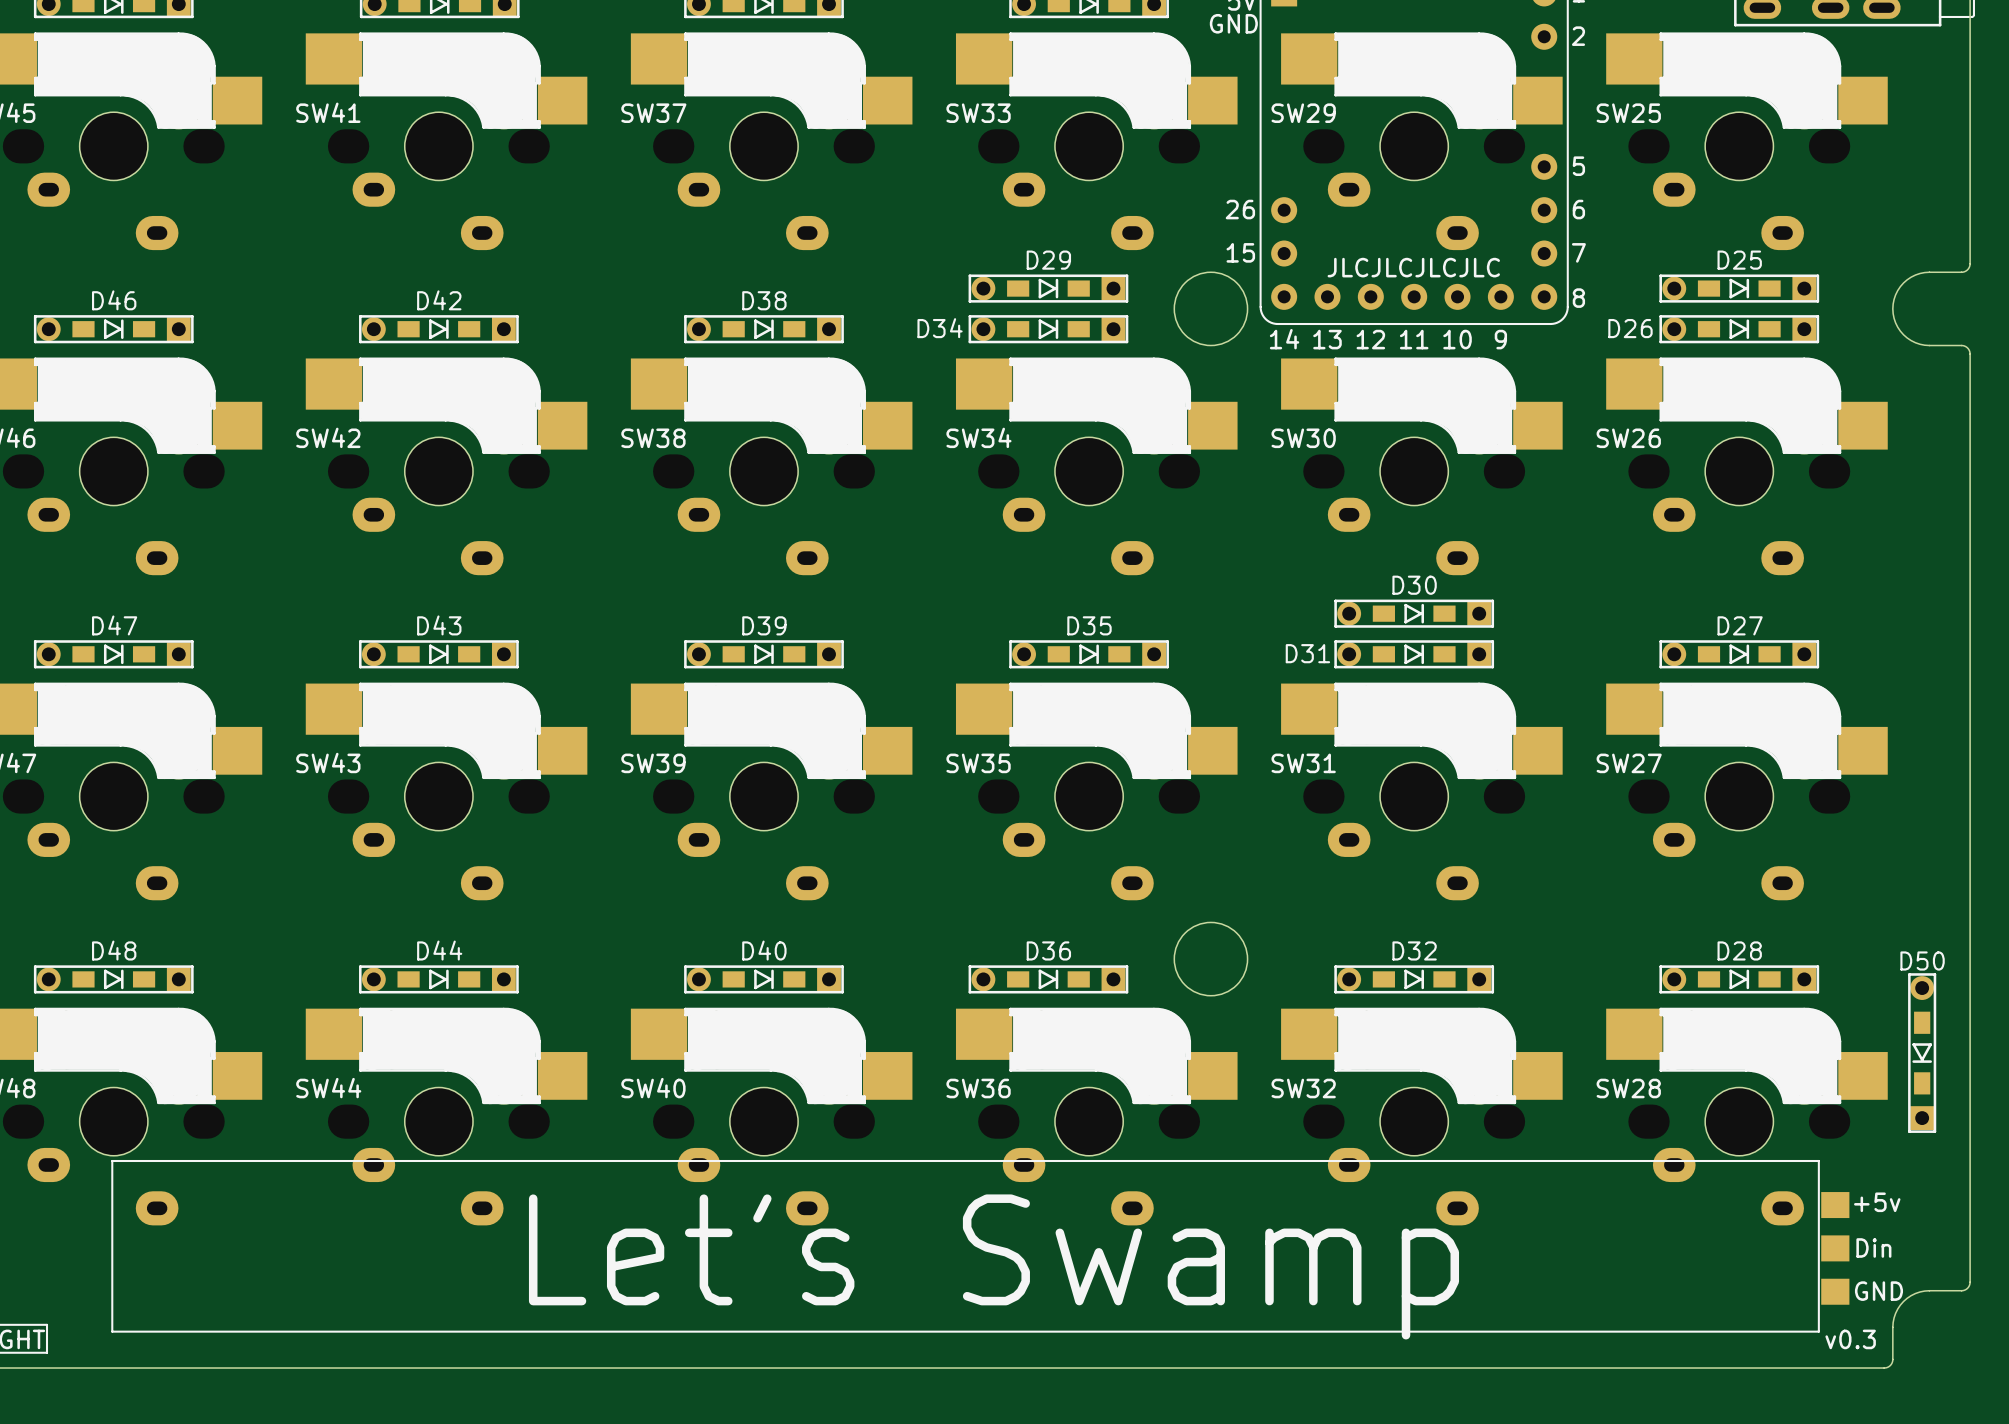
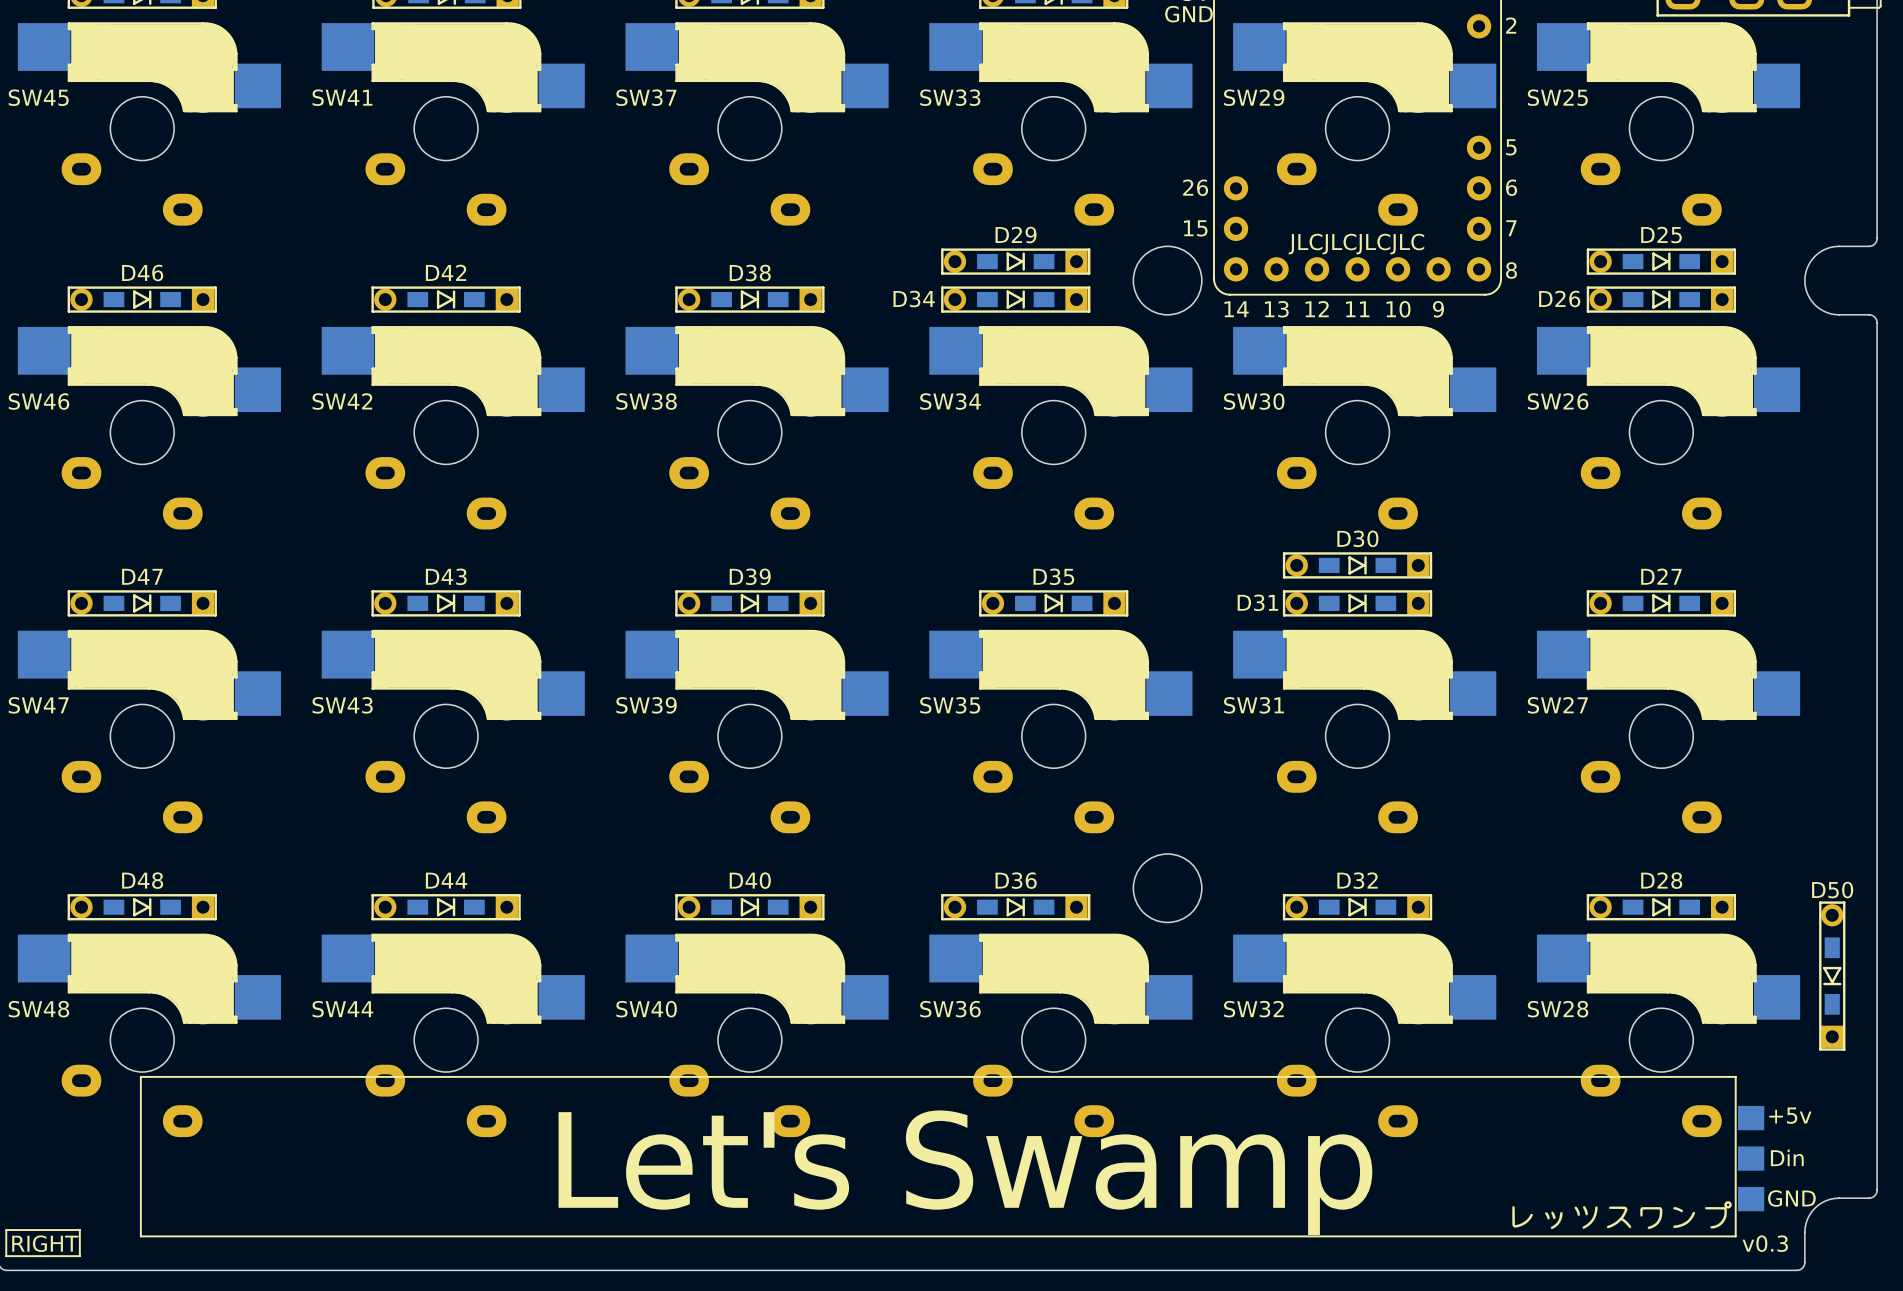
drawing: none -> [1512, 1201, 1732, 1230]

